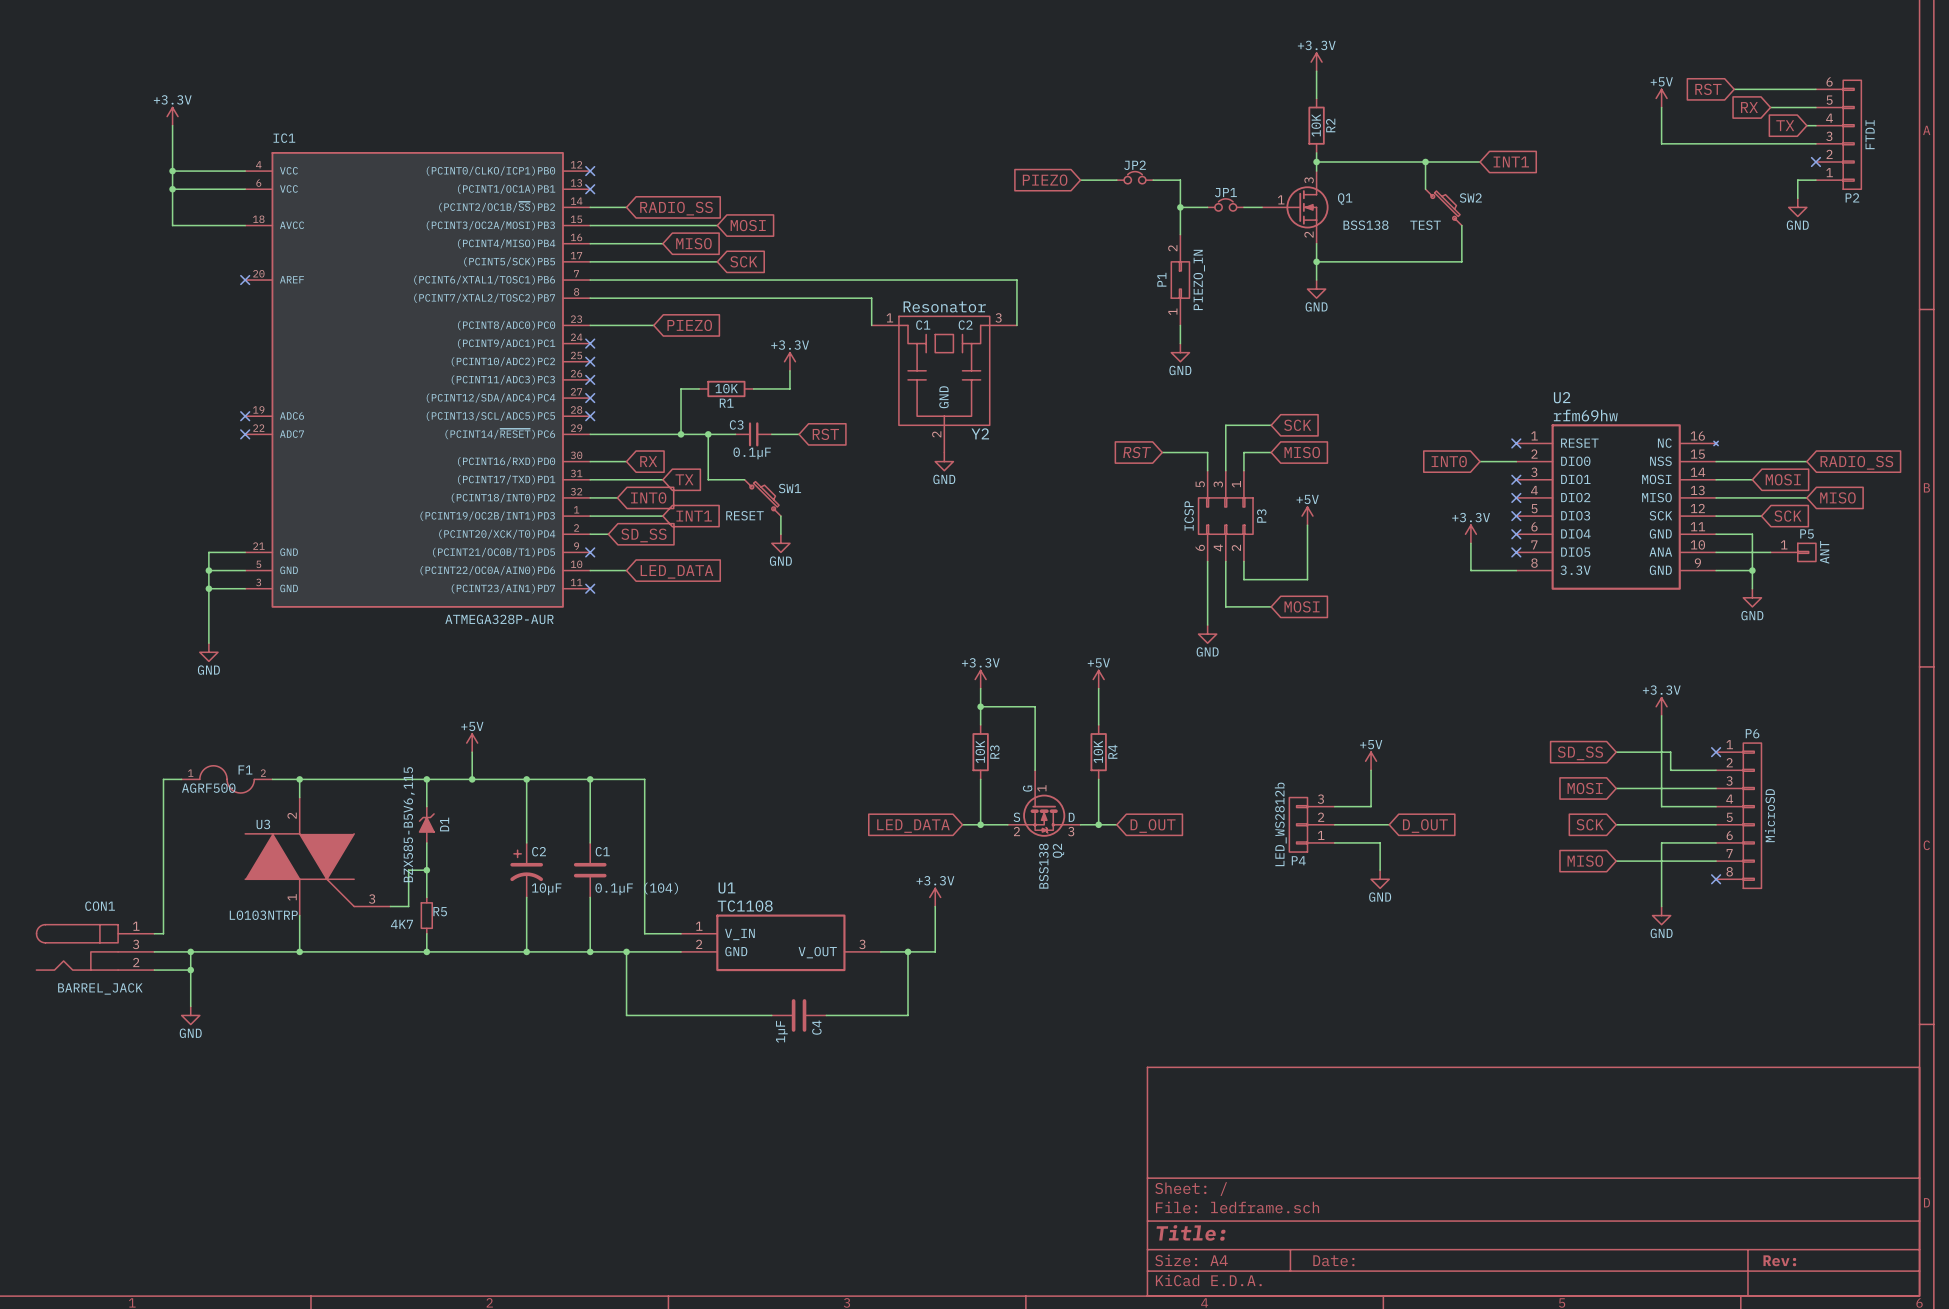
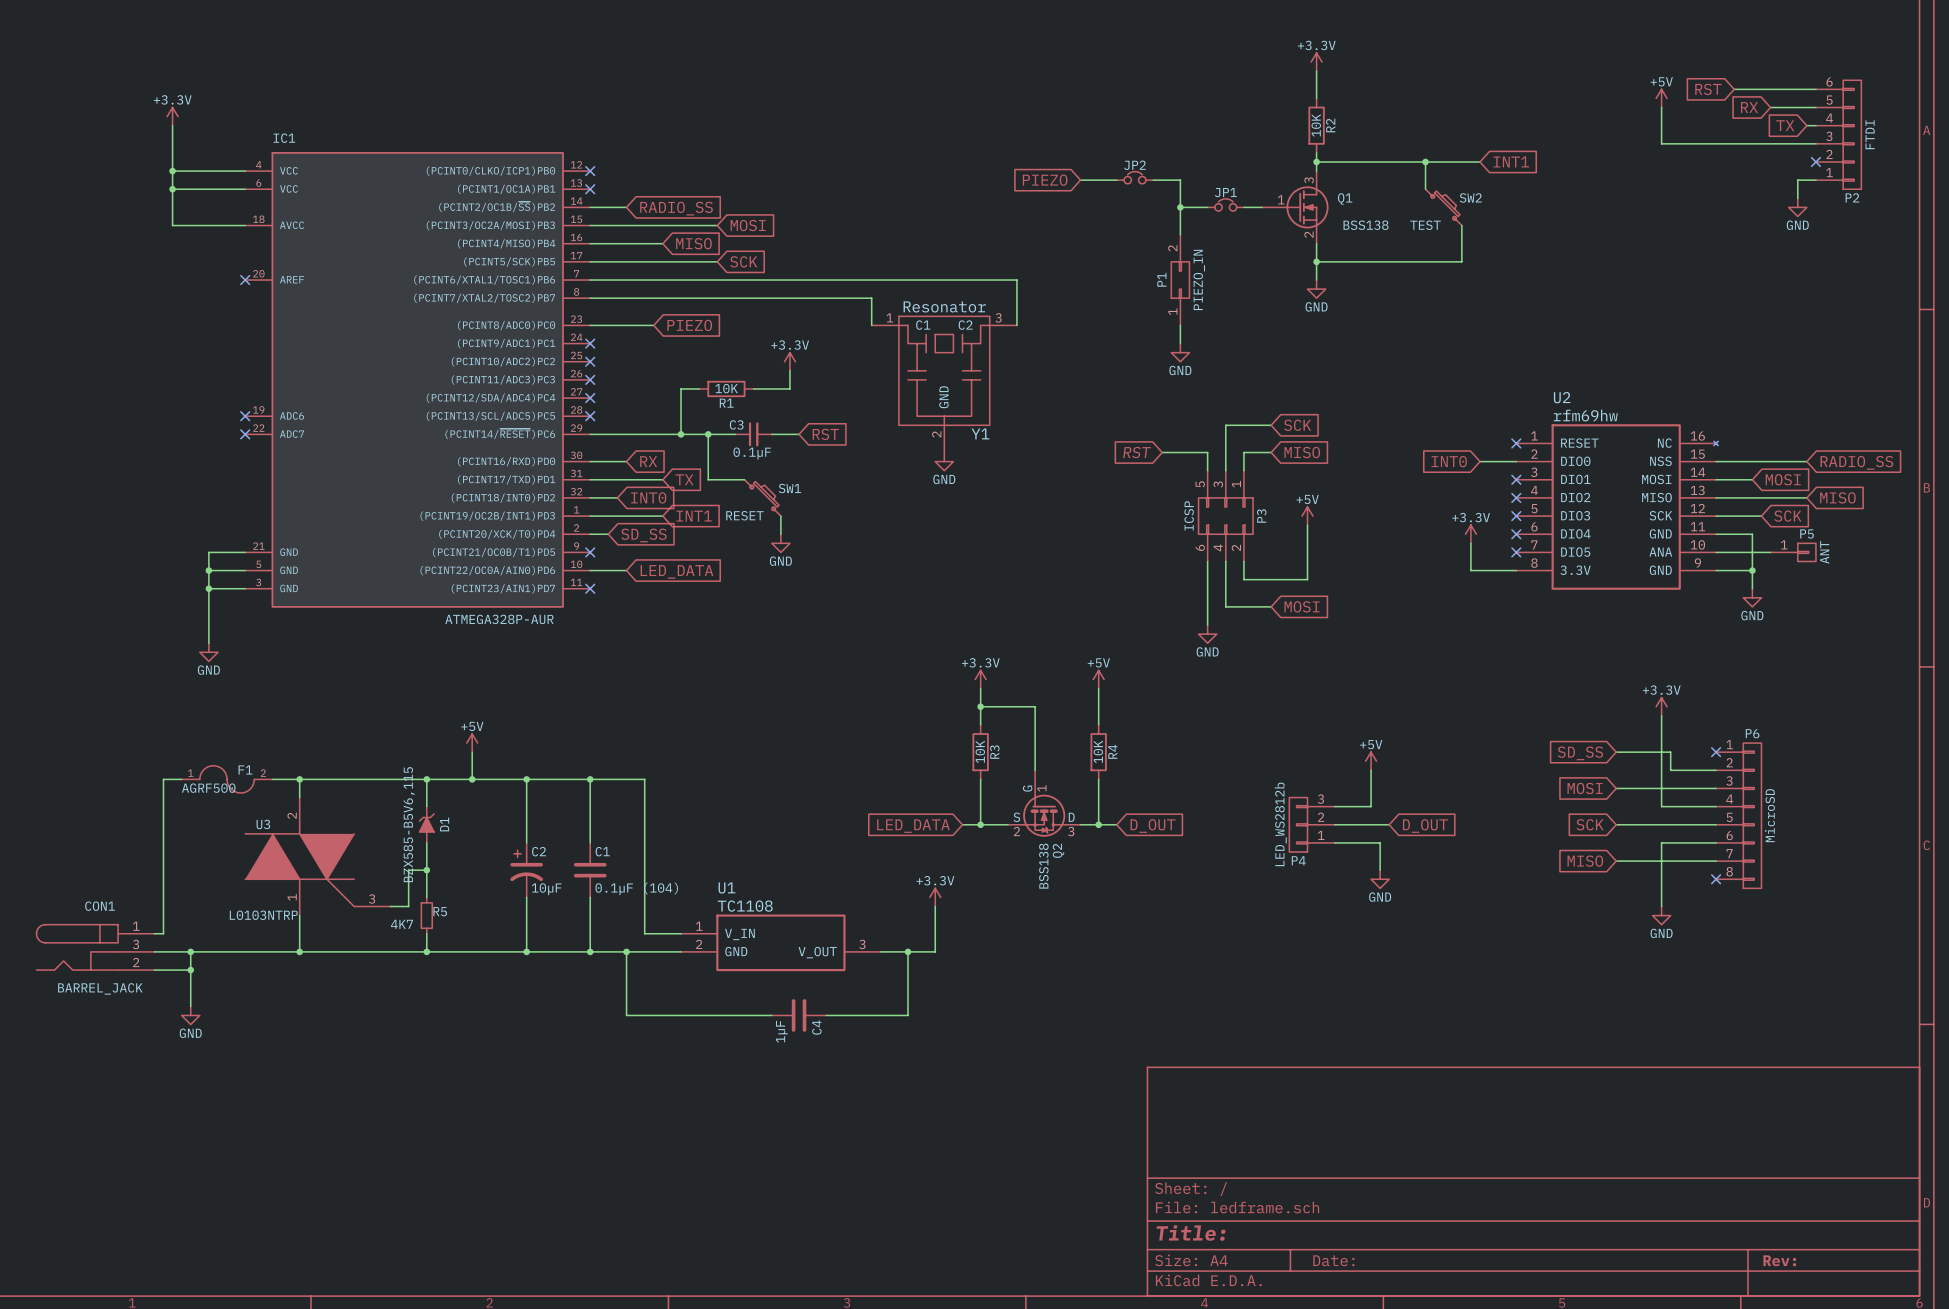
Y2 name: Y2 (980, 433) -> Y1 (980, 433)

